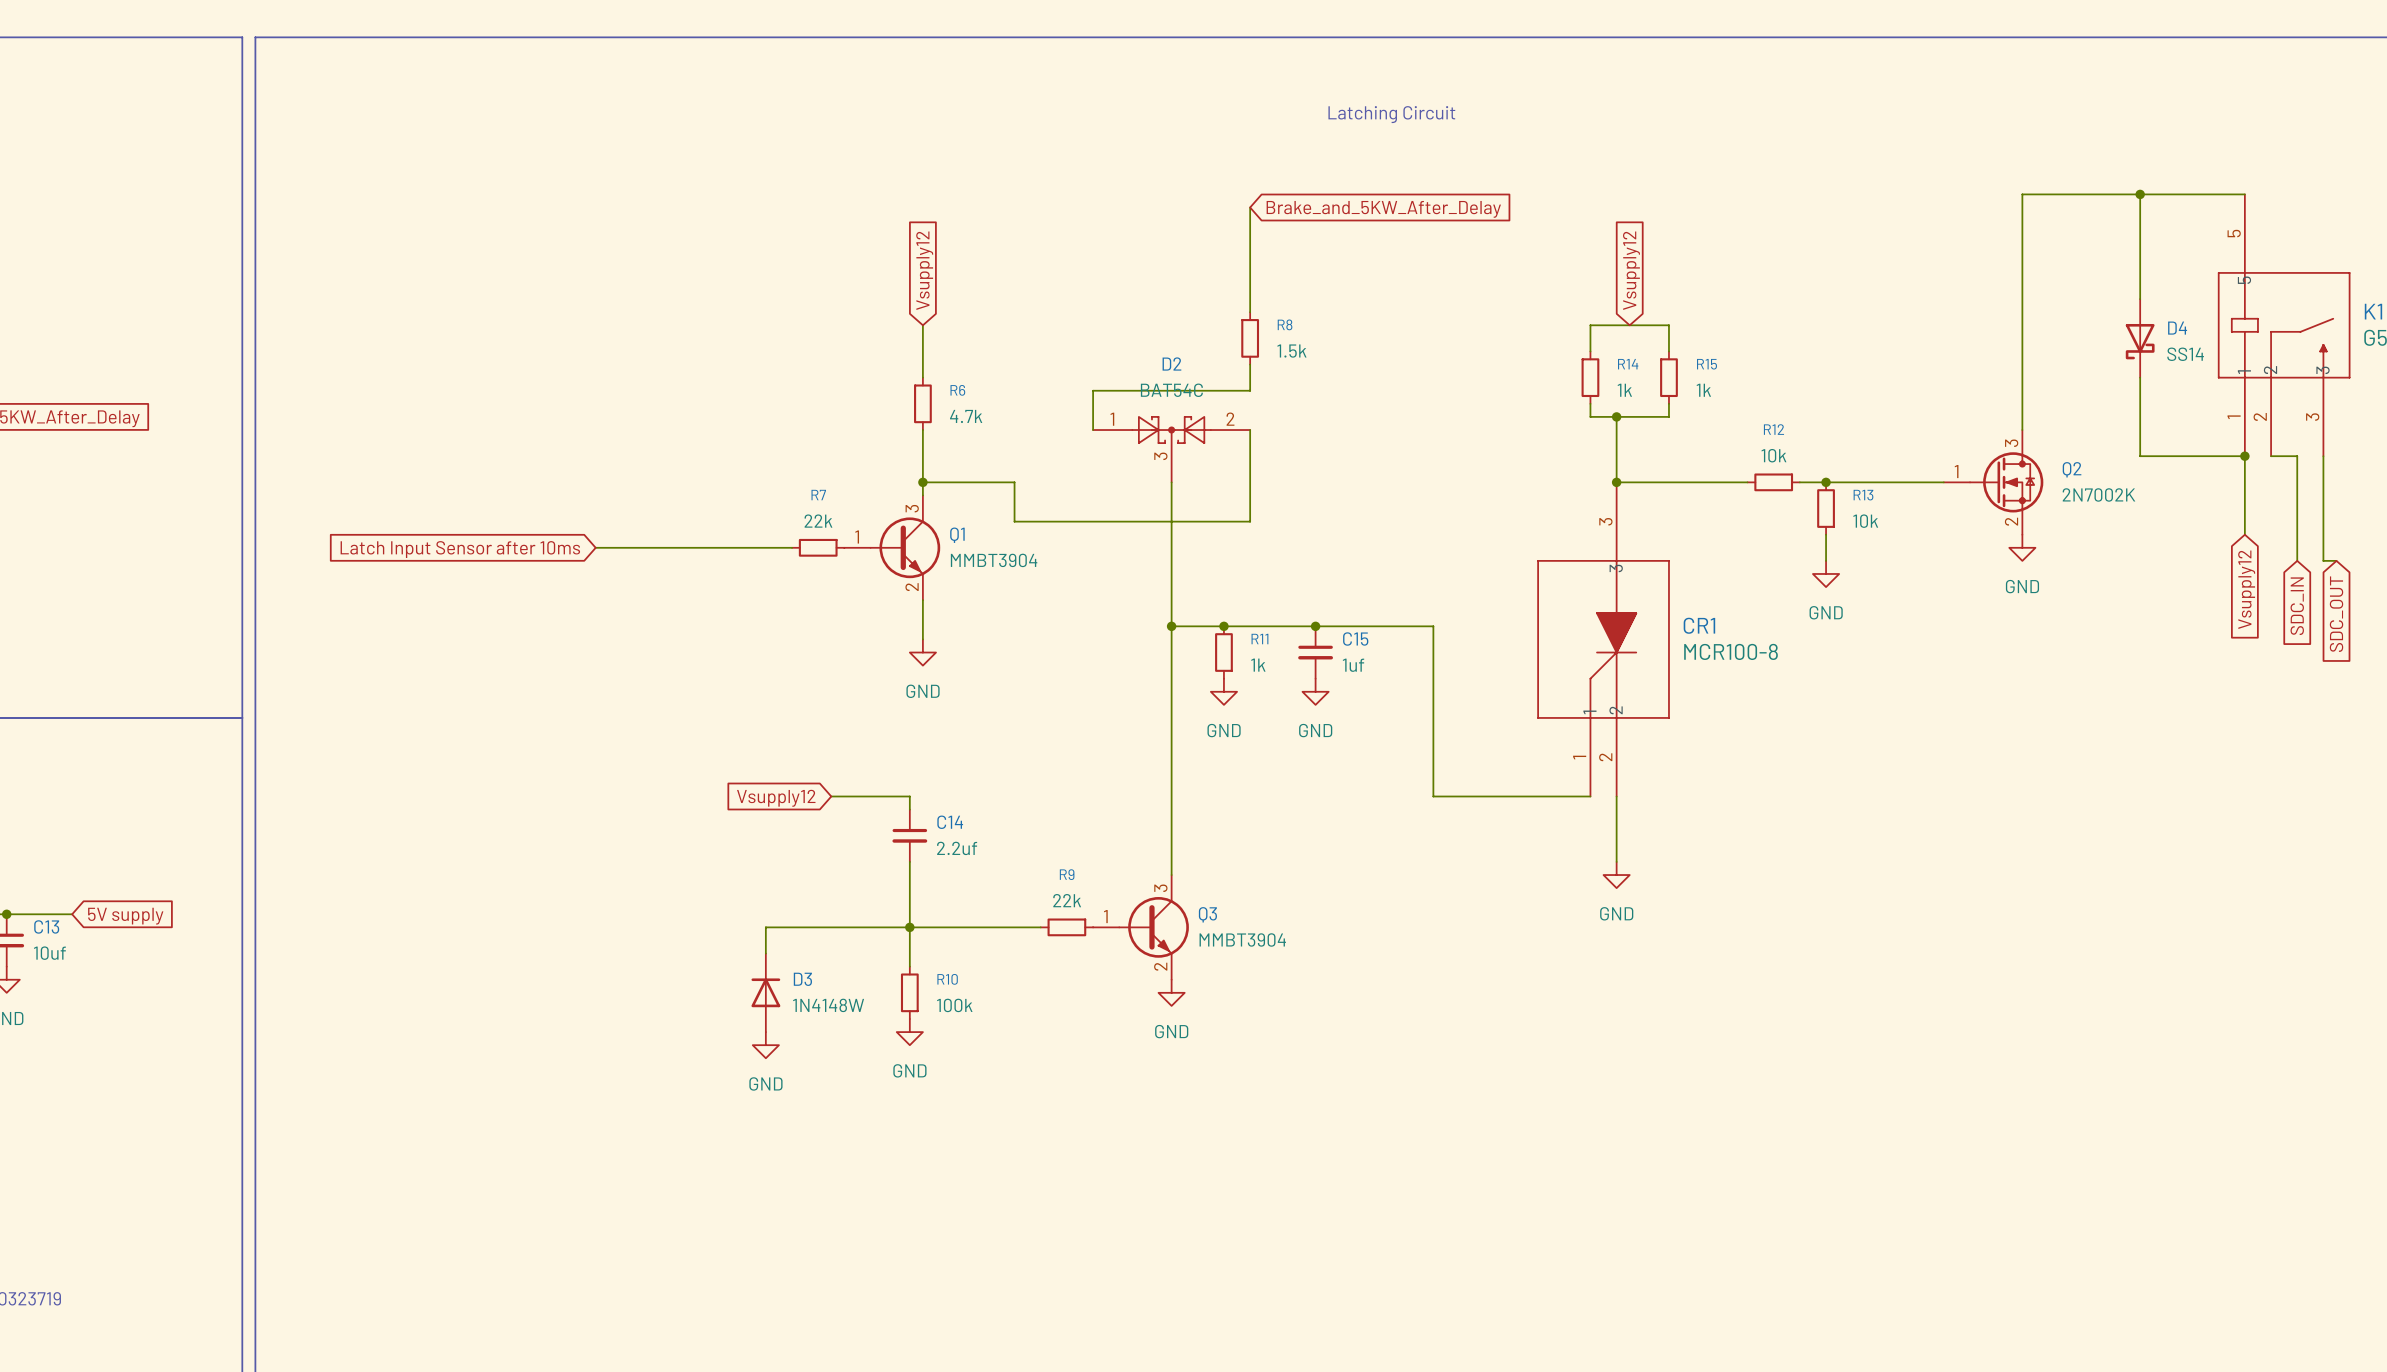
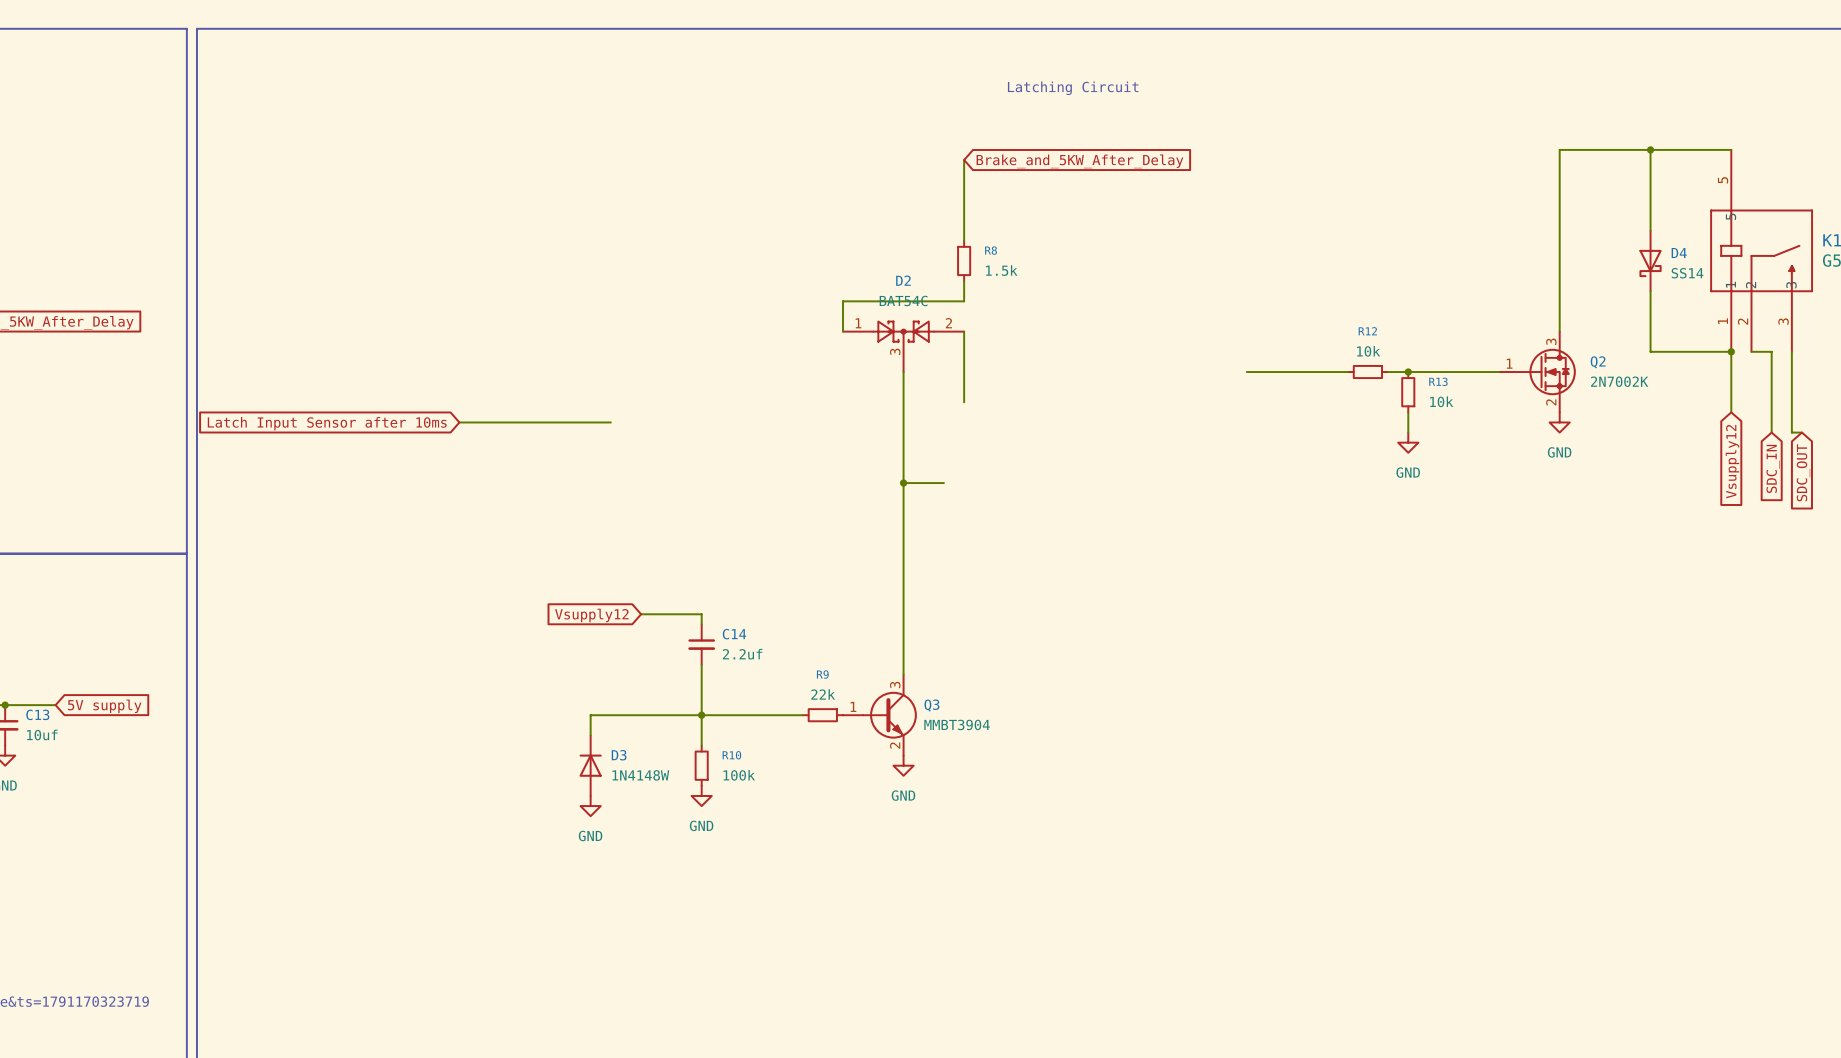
global label: Vsupply12 (924, 270) -> none
global label: Vsupply12 (1631, 270) -> none
wire: (922, 325) (922, 377) -> none
wire: (1590, 351) (1590, 325) (1668, 325) (1668, 351) -> none
R14: 1k (1590, 377) -> none
R15: 1k (1668, 377) -> none
R6: 4.7k (922, 403) -> none
wire: (1590, 403) (1590, 416) (1668, 416) (1668, 403) -> none
wire: (1616, 416) (1616, 482) -> none
junction: (1616, 416) -> none
wire: (922, 430) (922, 495) -> none
wire: (922, 482) (1014, 482) (1014, 521) (1250, 521) -> none
junction: (922, 482) -> none
junction: (1616, 482) -> none
R7: 22k (818, 547) -> none
Q1: MMBT3904 (892, 547) -> none
wire: (922, 600) (922, 639) -> none
wire: (1223, 626) (1433, 626) (1433, 796) (1590, 796) -> none
junction: (1223, 626) -> none
junction: (1315, 626) -> none
CR1: MCR100-8 (1603, 639) -> none
power symbol: GND (922, 652) -> none
R11: 1k (1223, 652) -> none
C15: 1uf (1315, 652) -> none
power symbol: GND (1223, 691) -> none
power symbol: GND (1315, 691) -> none
wire: (1616, 796) (1616, 861) -> none
power symbol: GND (1616, 875) -> none

